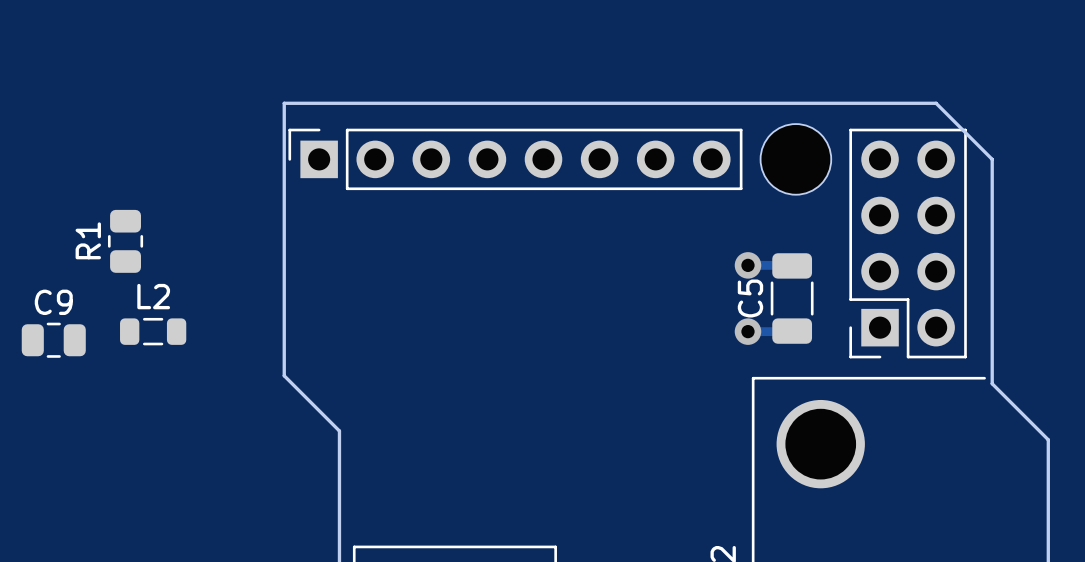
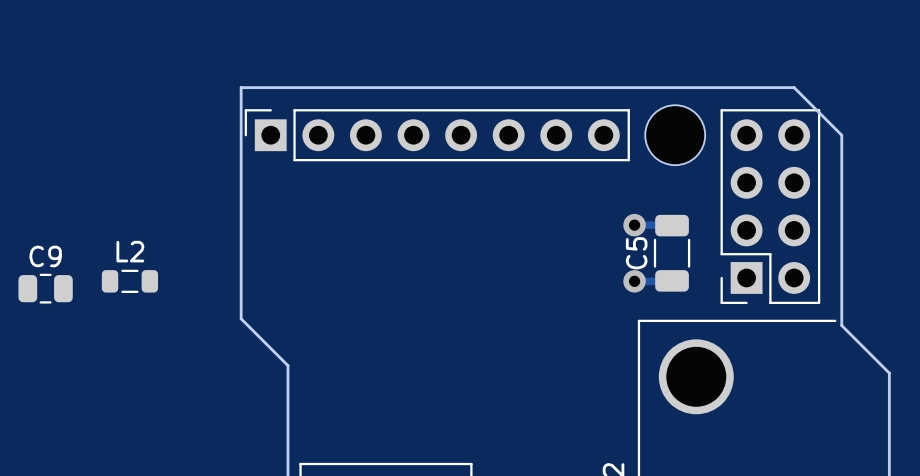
R1: (125, 241) -> none

